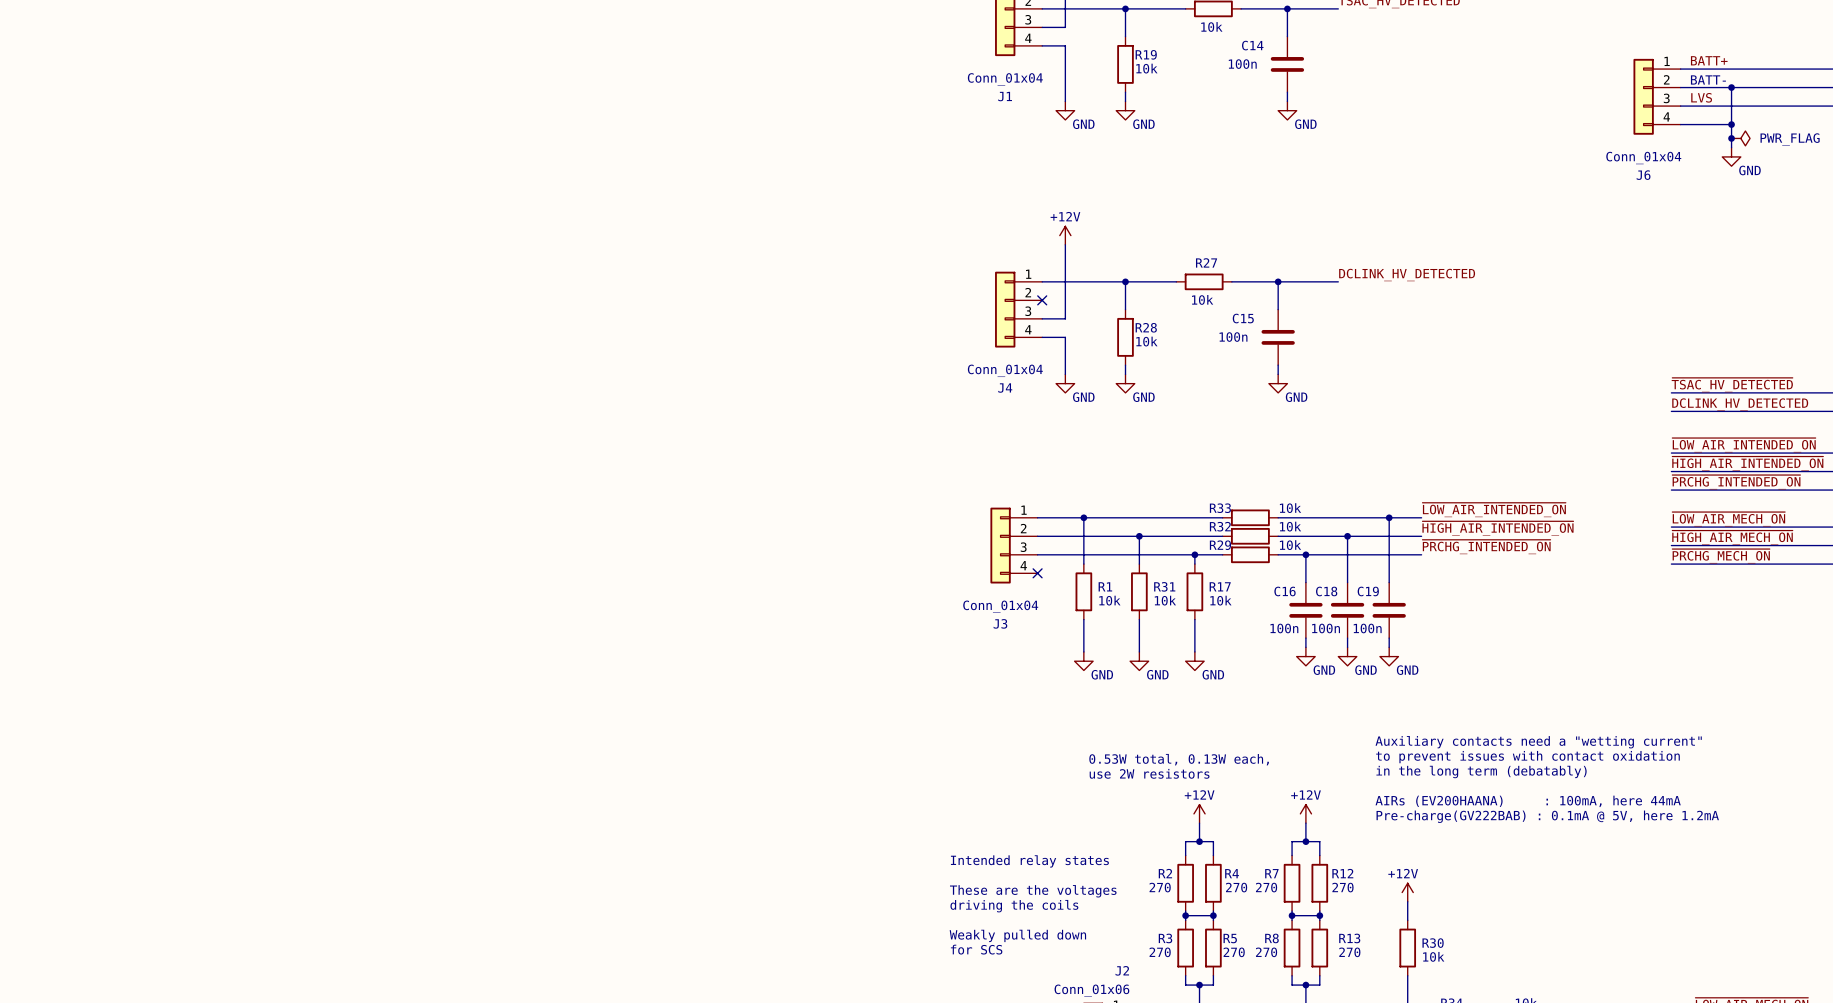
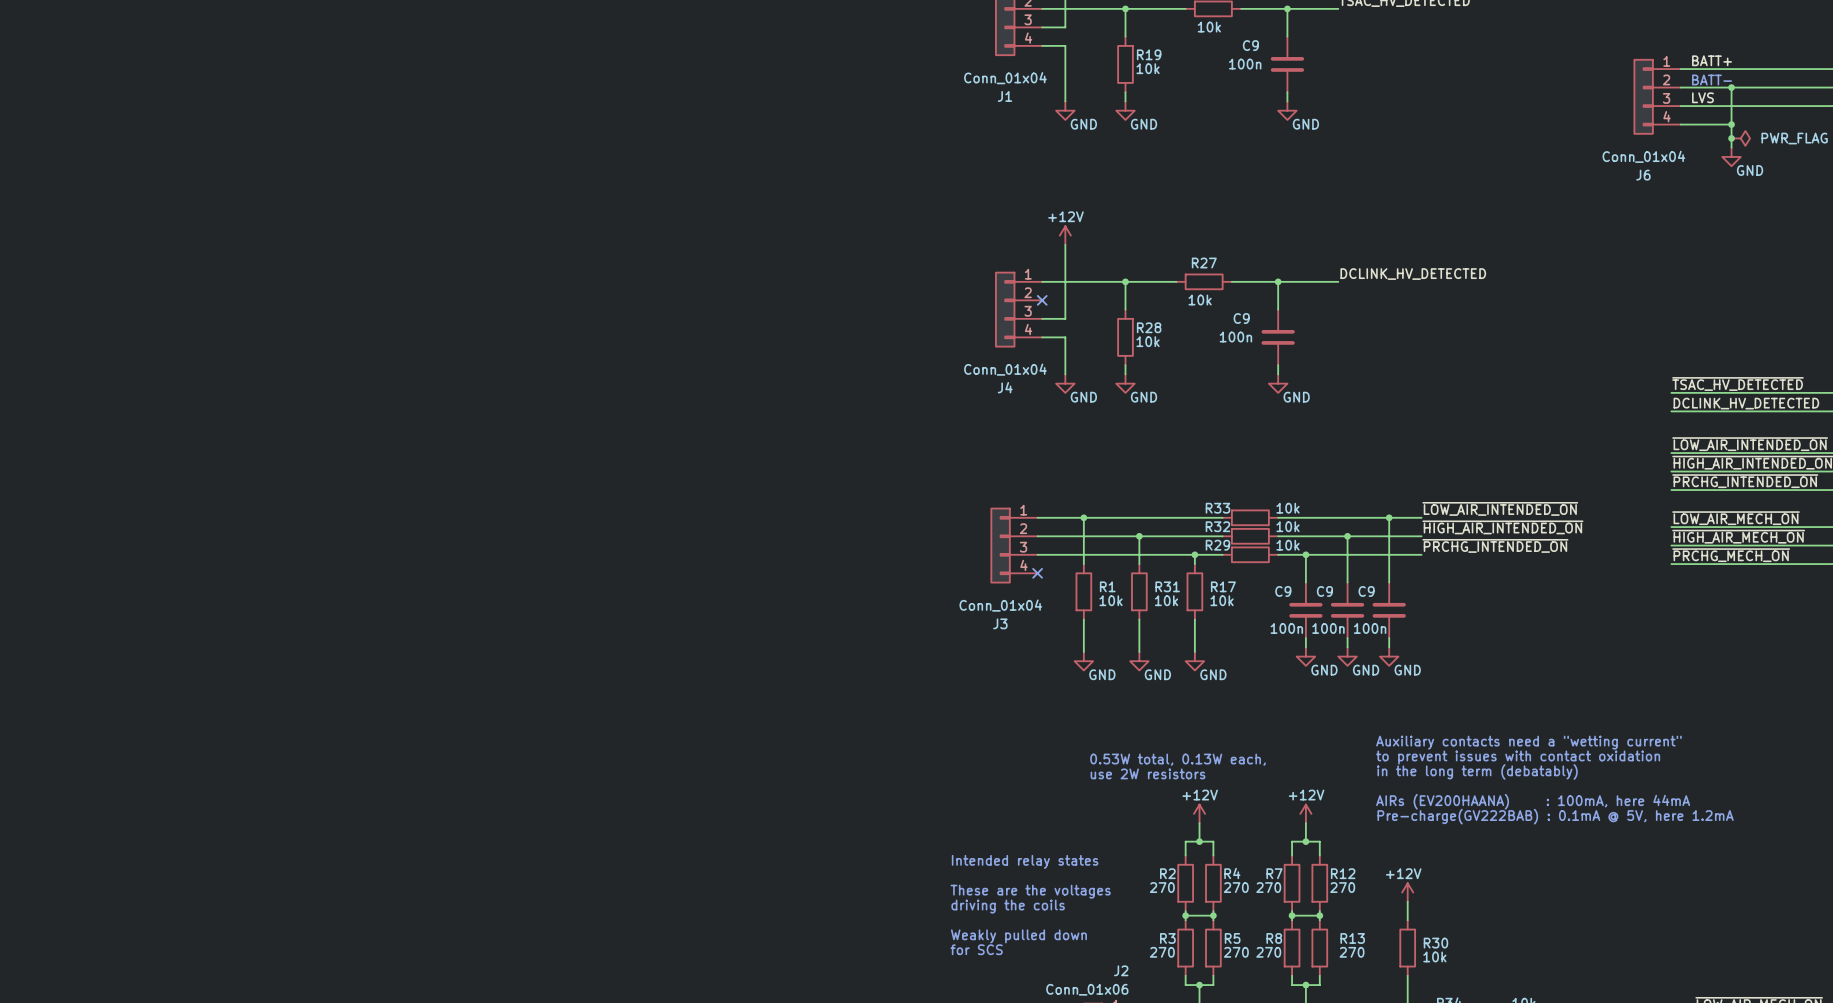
C14 name: C14 (1252, 45) -> C9 (1250, 45)
C15 name: C15 (1243, 318) -> C9 (1241, 318)
C16 name: C16 (1285, 591) -> C9 (1283, 591)
C18 name: C18 (1326, 591) -> C9 (1324, 591)
C19 name: C19 (1368, 591) -> C9 (1366, 591)

